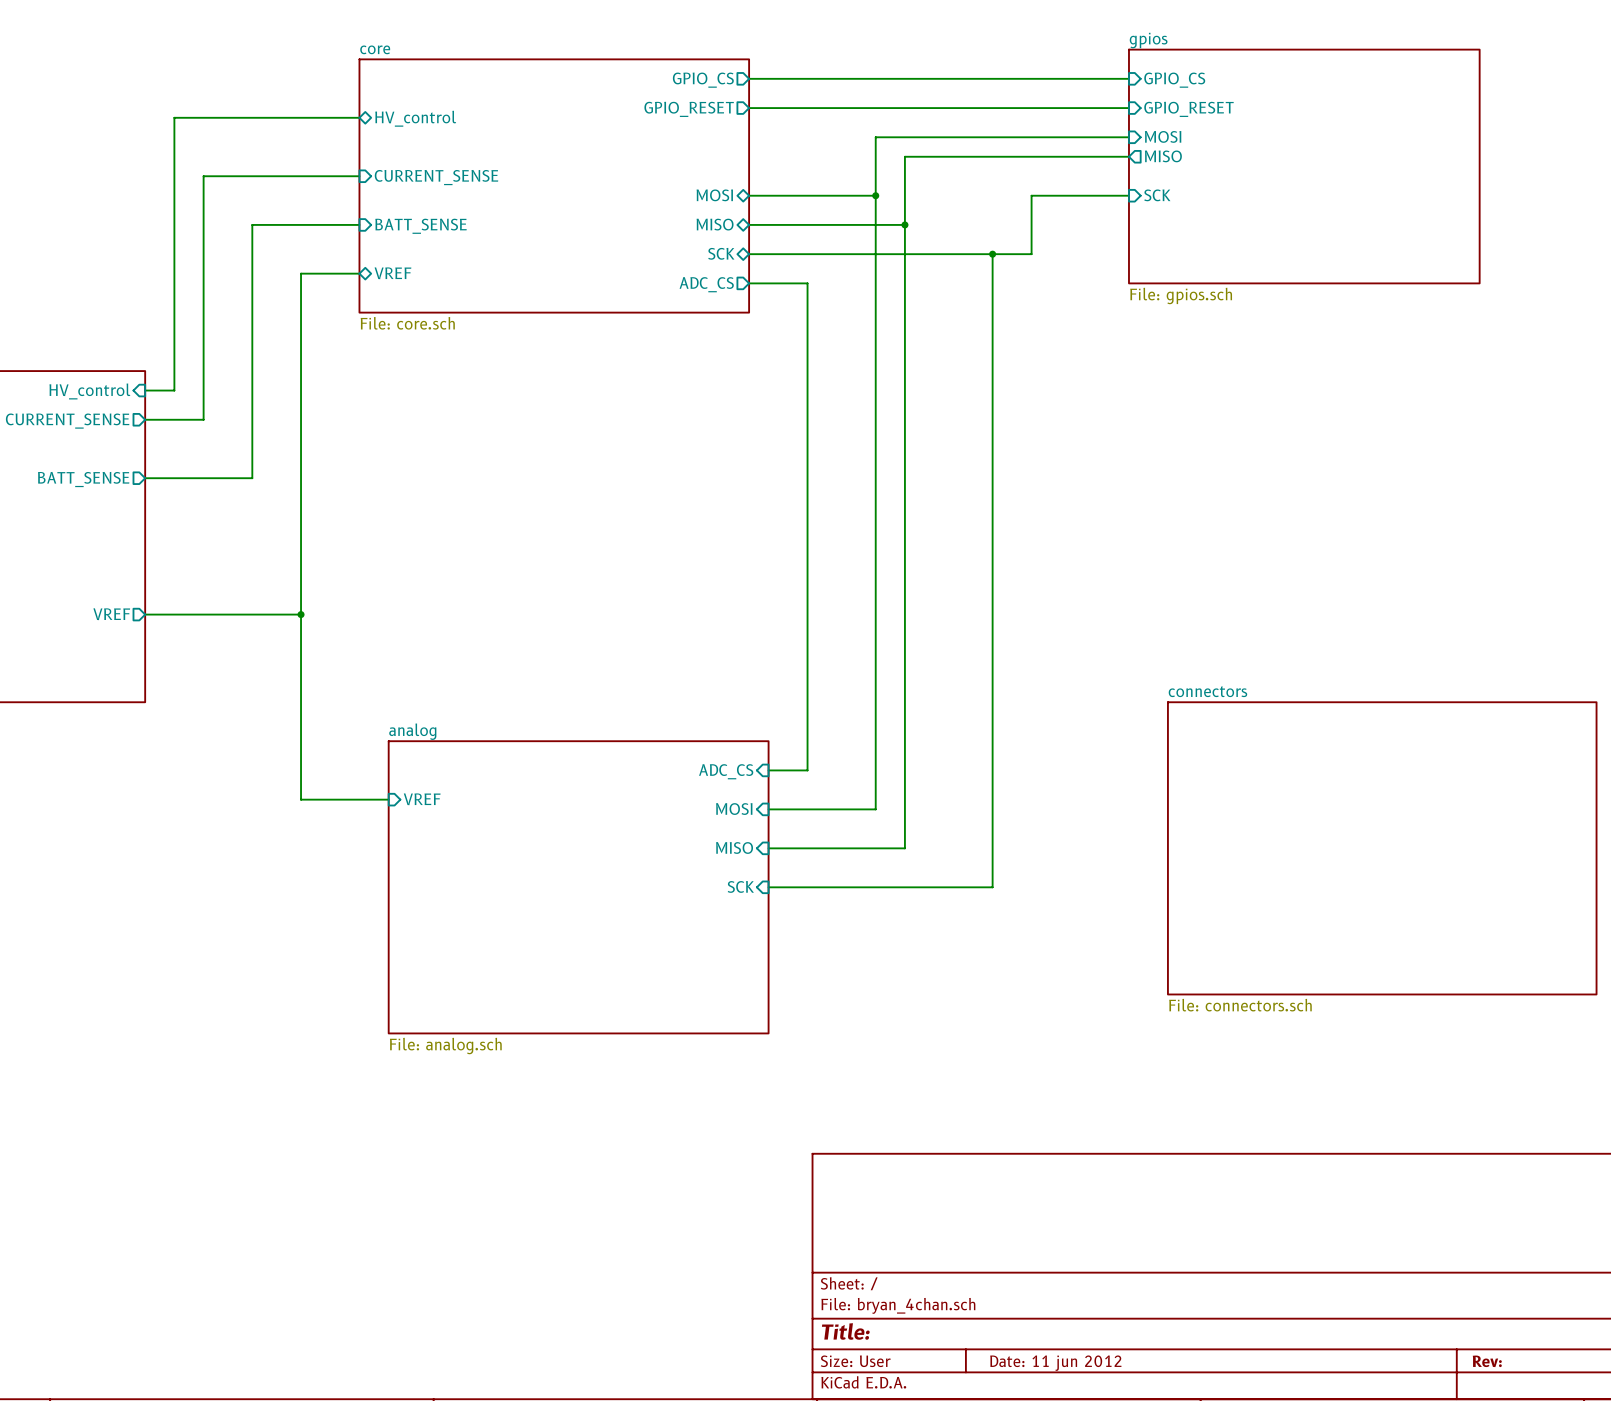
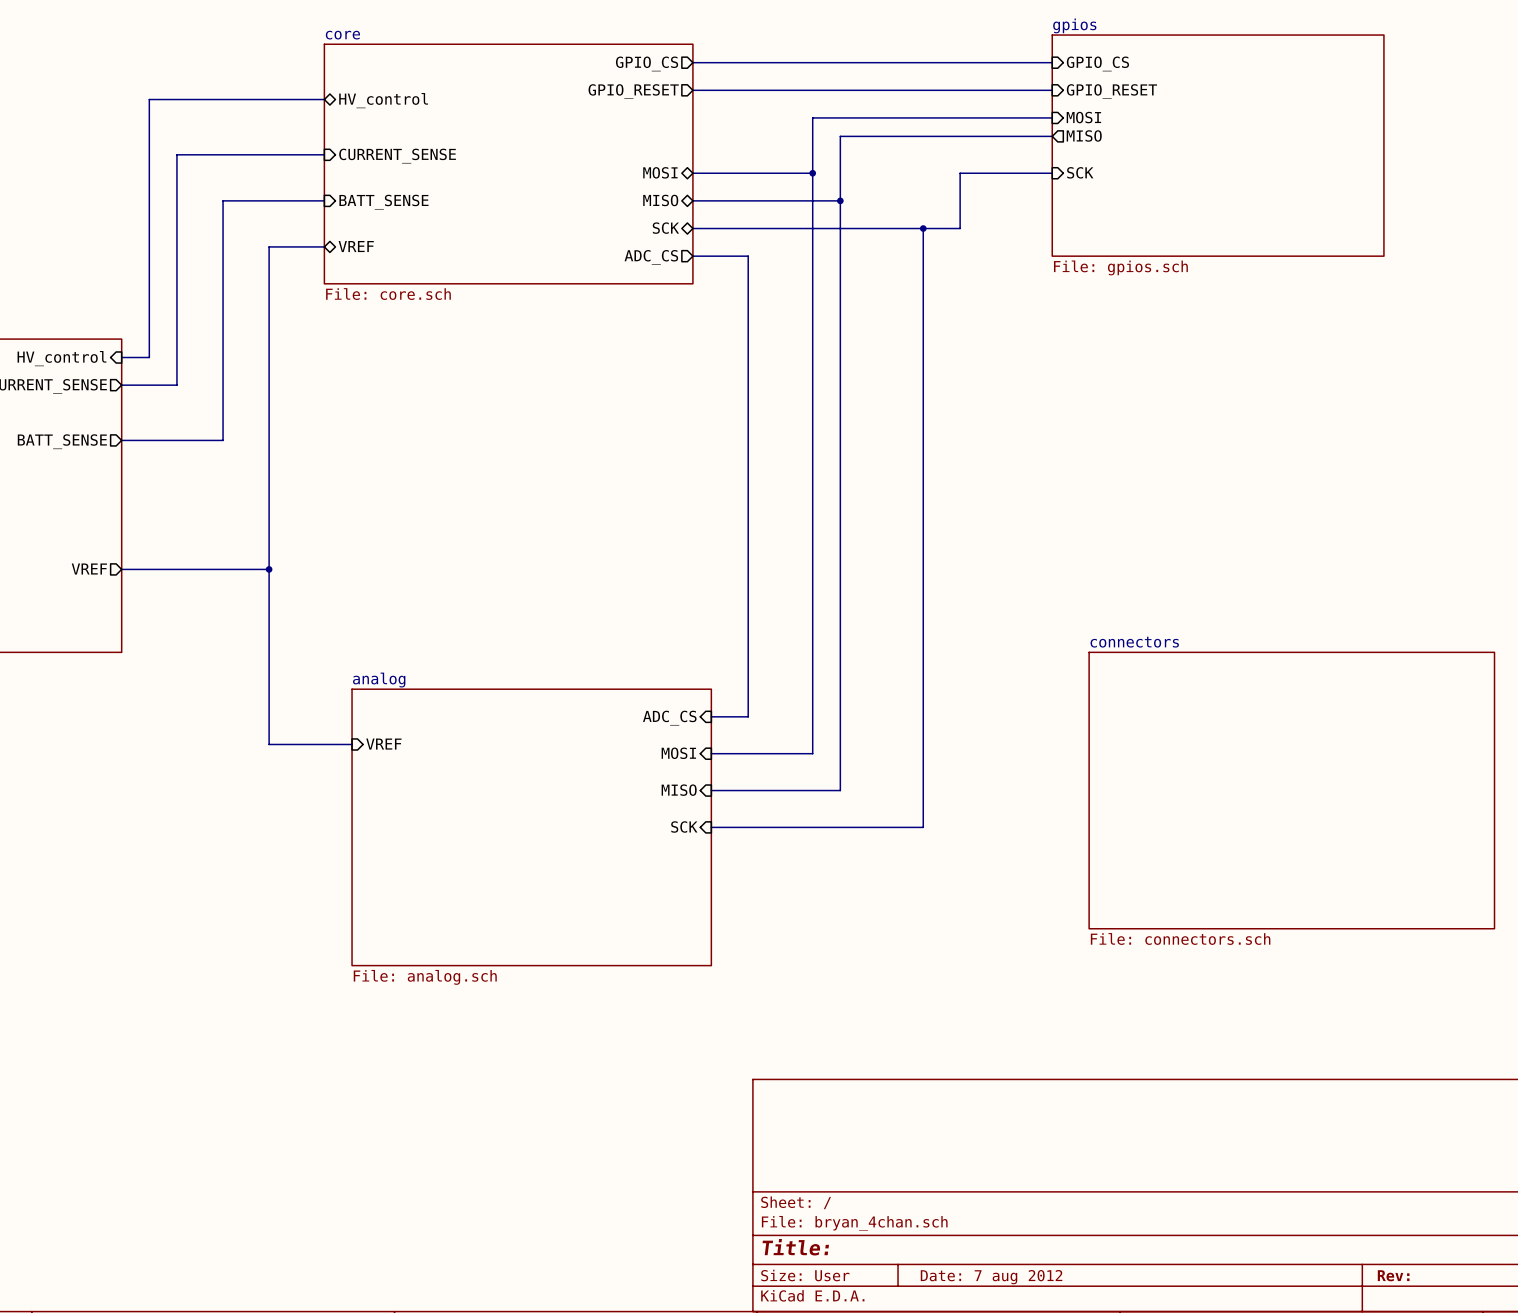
title block: Date: 11 jun 2012 (1055, 1363) -> Date: 7 aug 2012 (991, 1277)

